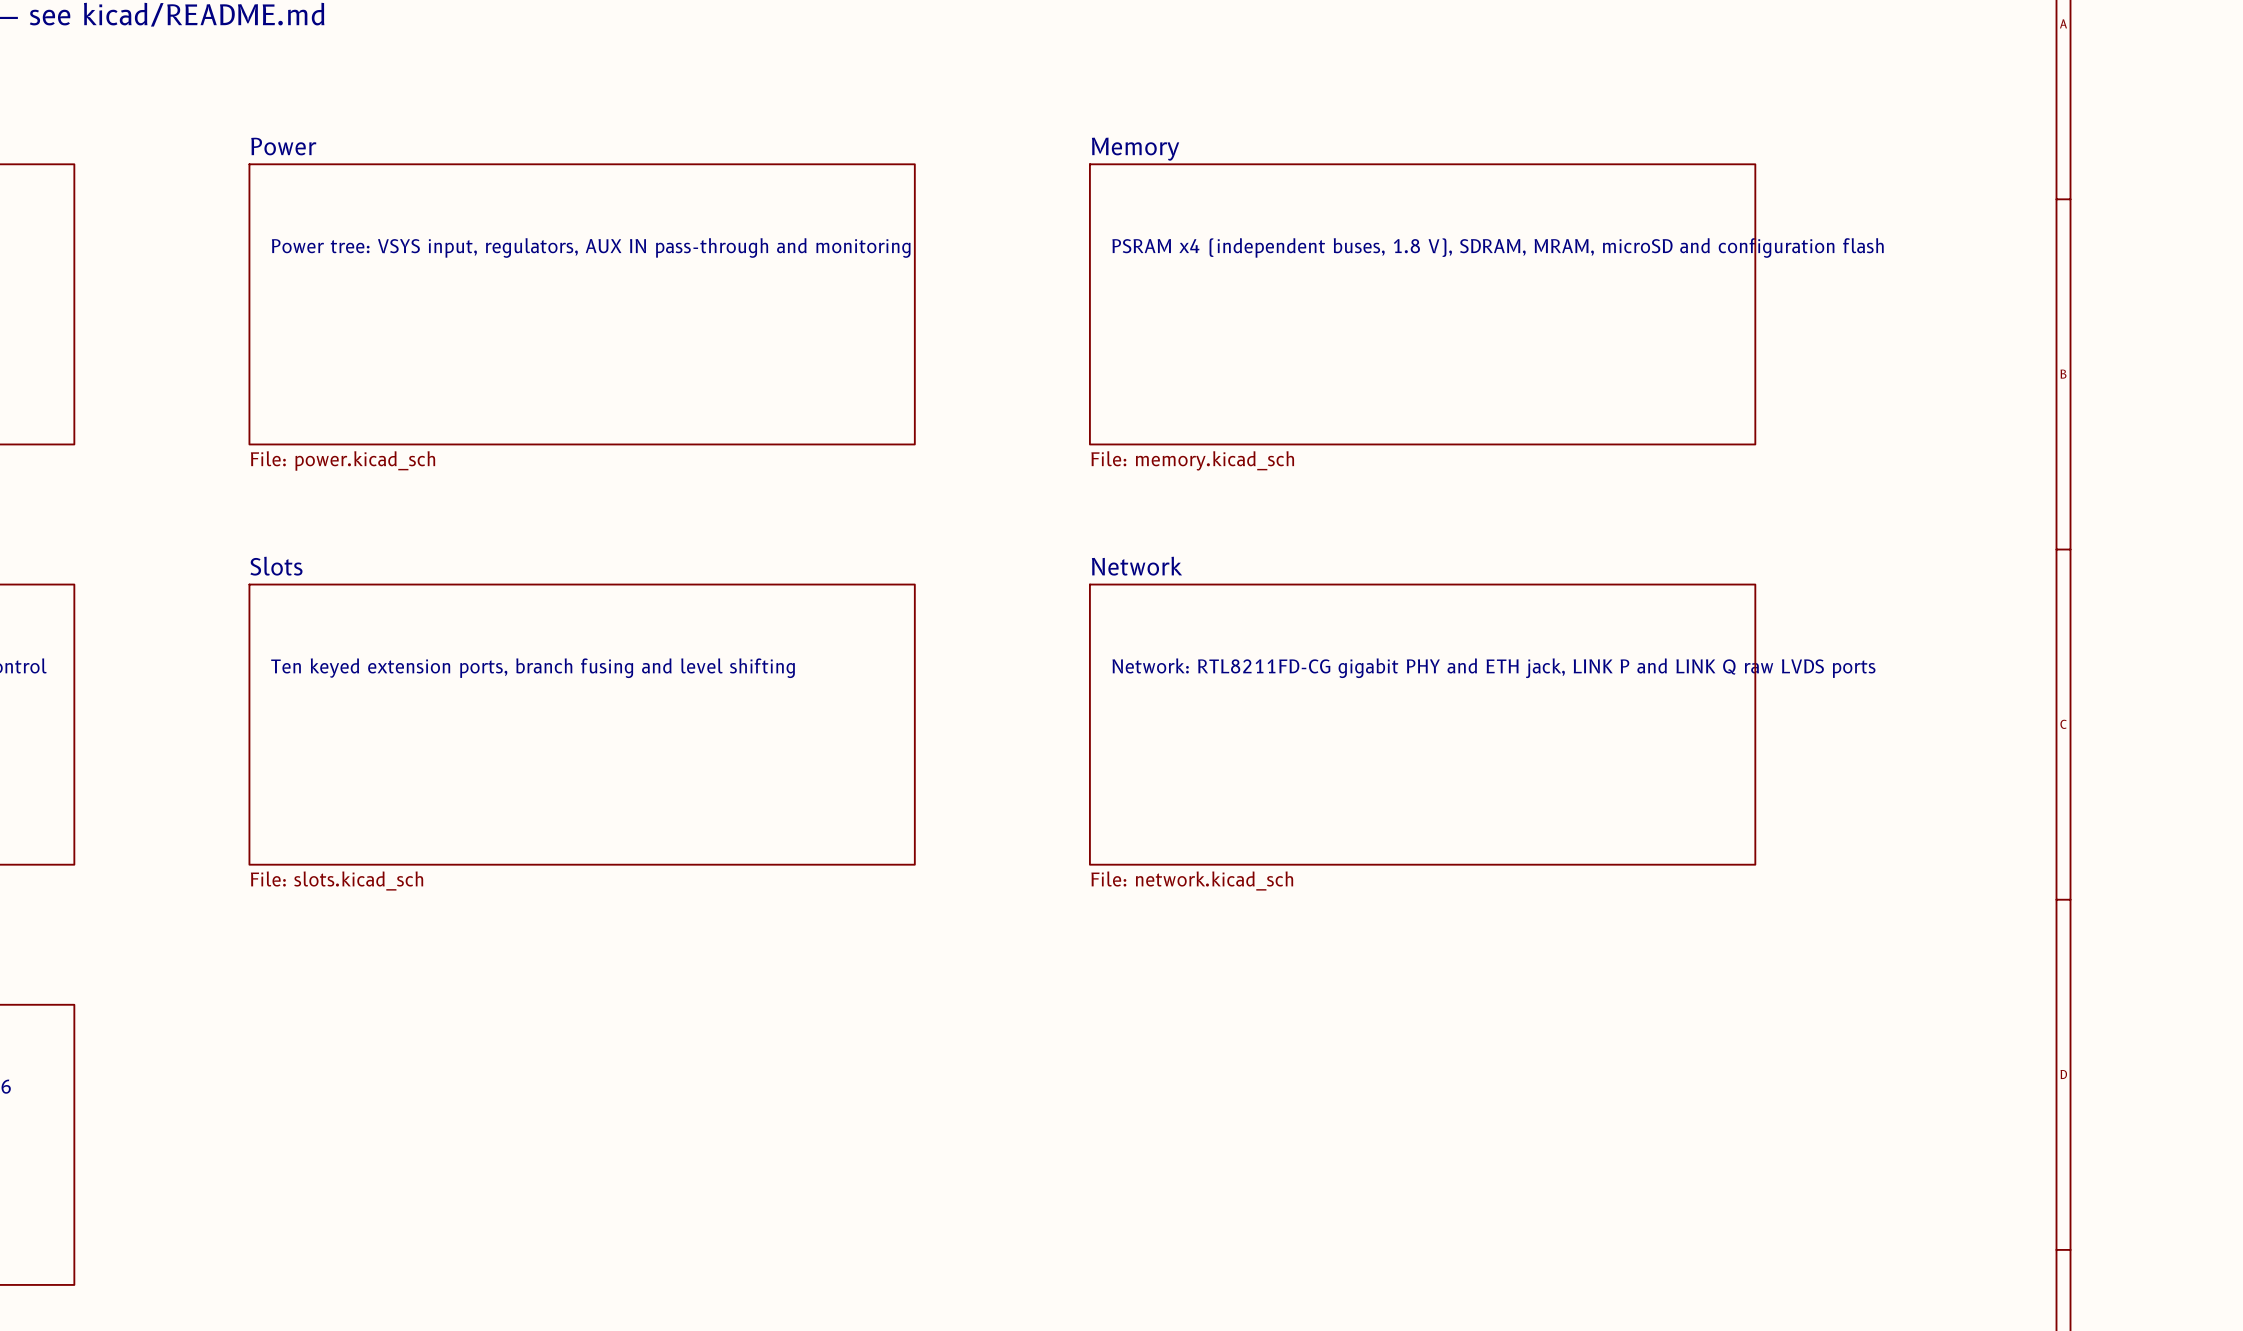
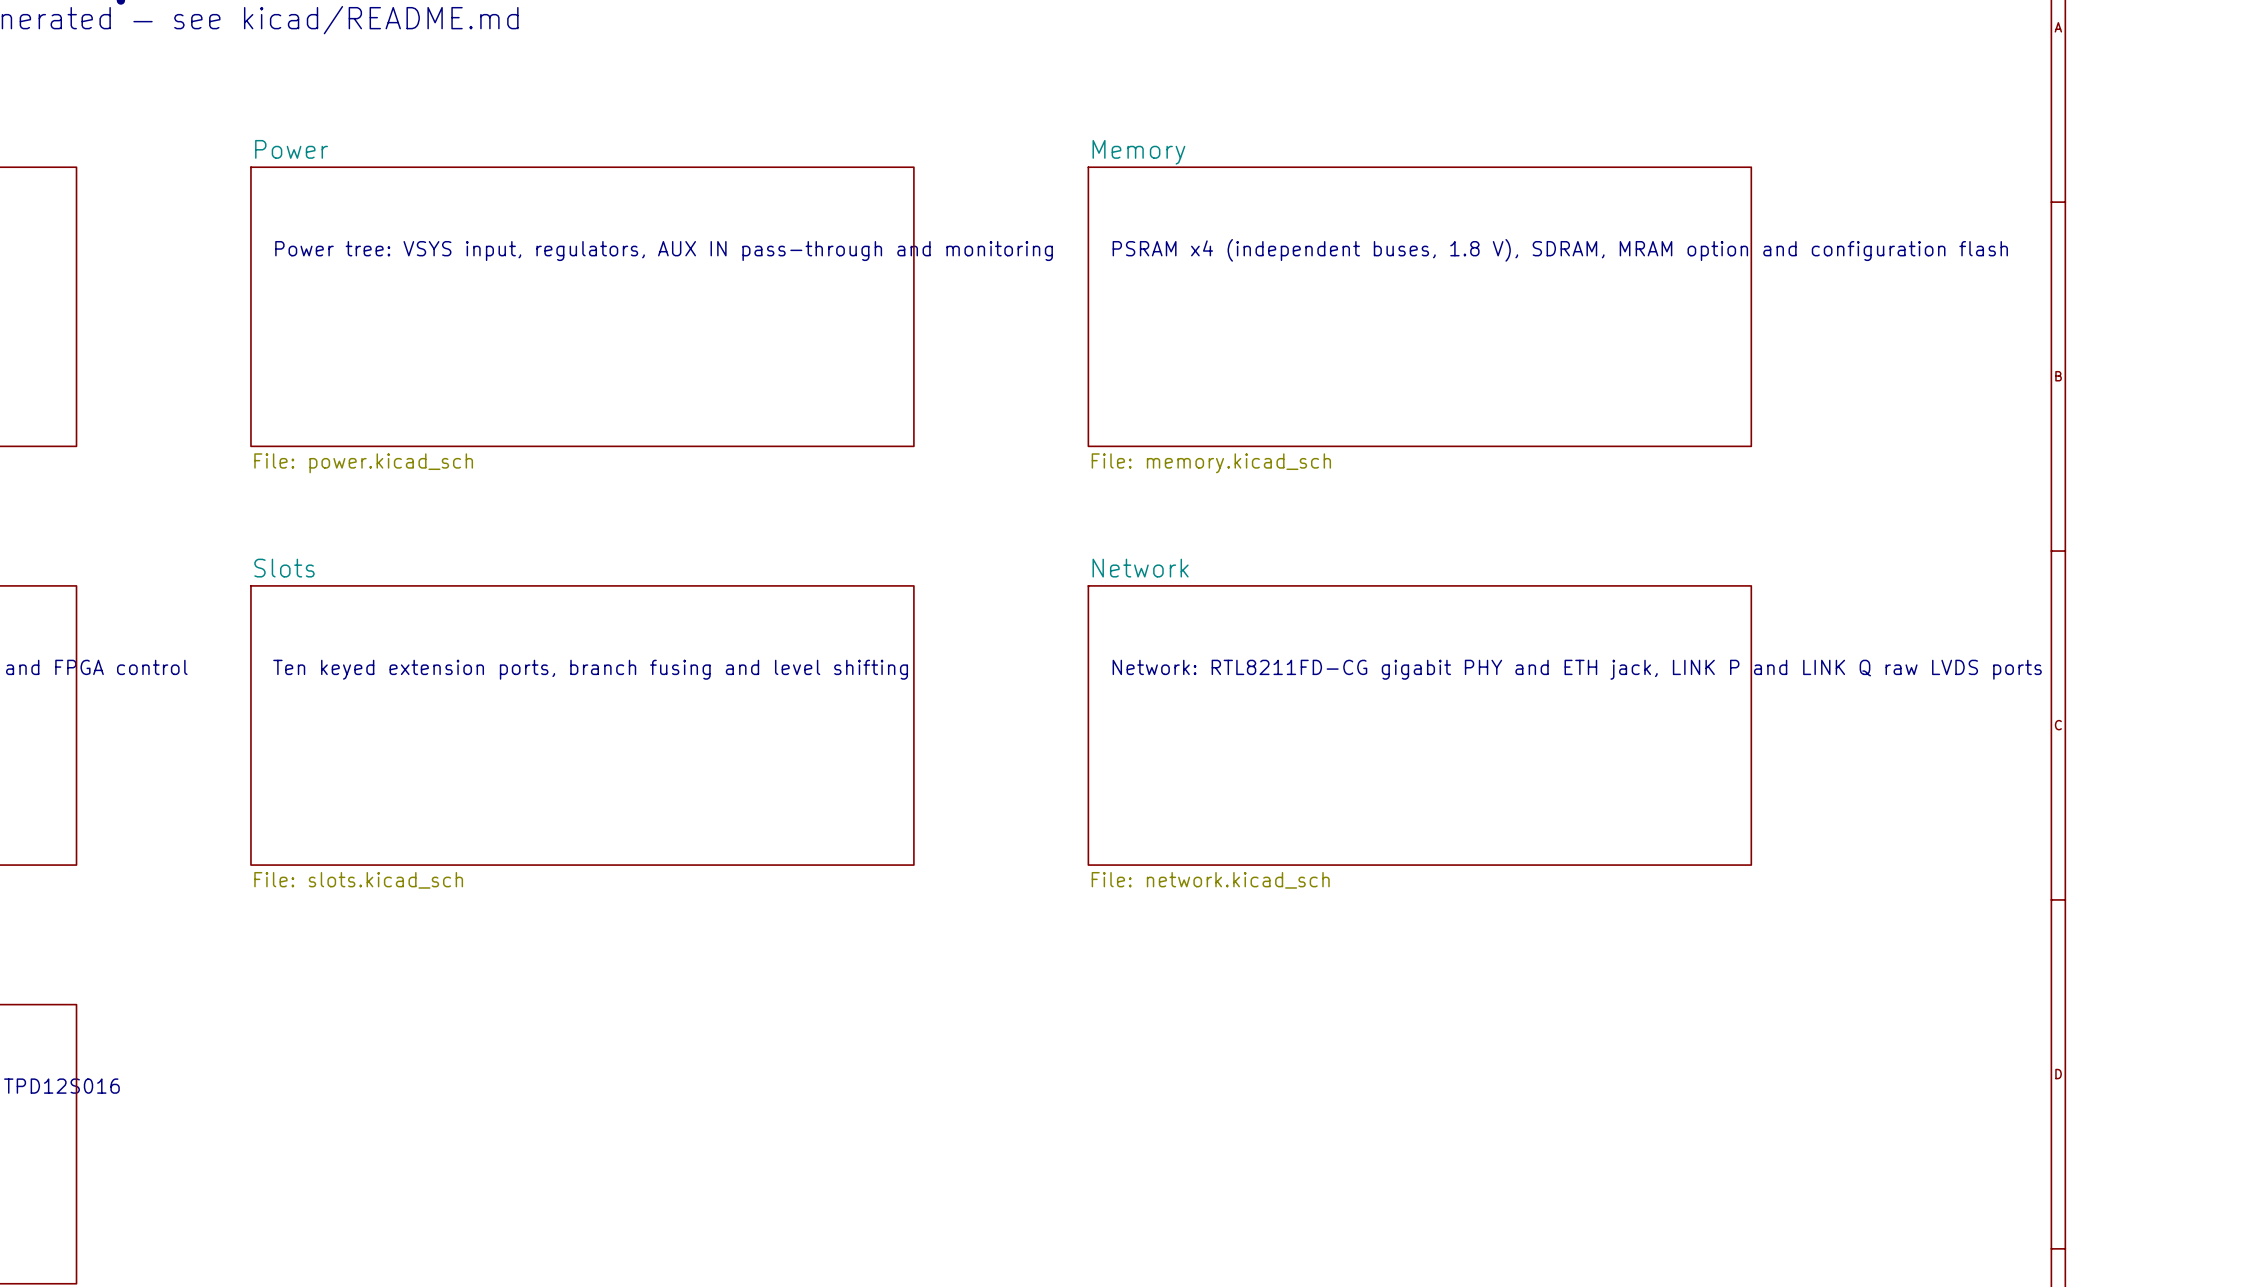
text: PSRAM x4 (independent buses, 1.8 V), SDRAM, MRAM, microSD and configuration flash (1498, 247) -> PSRAM x4 (independent buses, 1.8 V), SDRAM, MRAM option and configuration flash (1560, 250)

